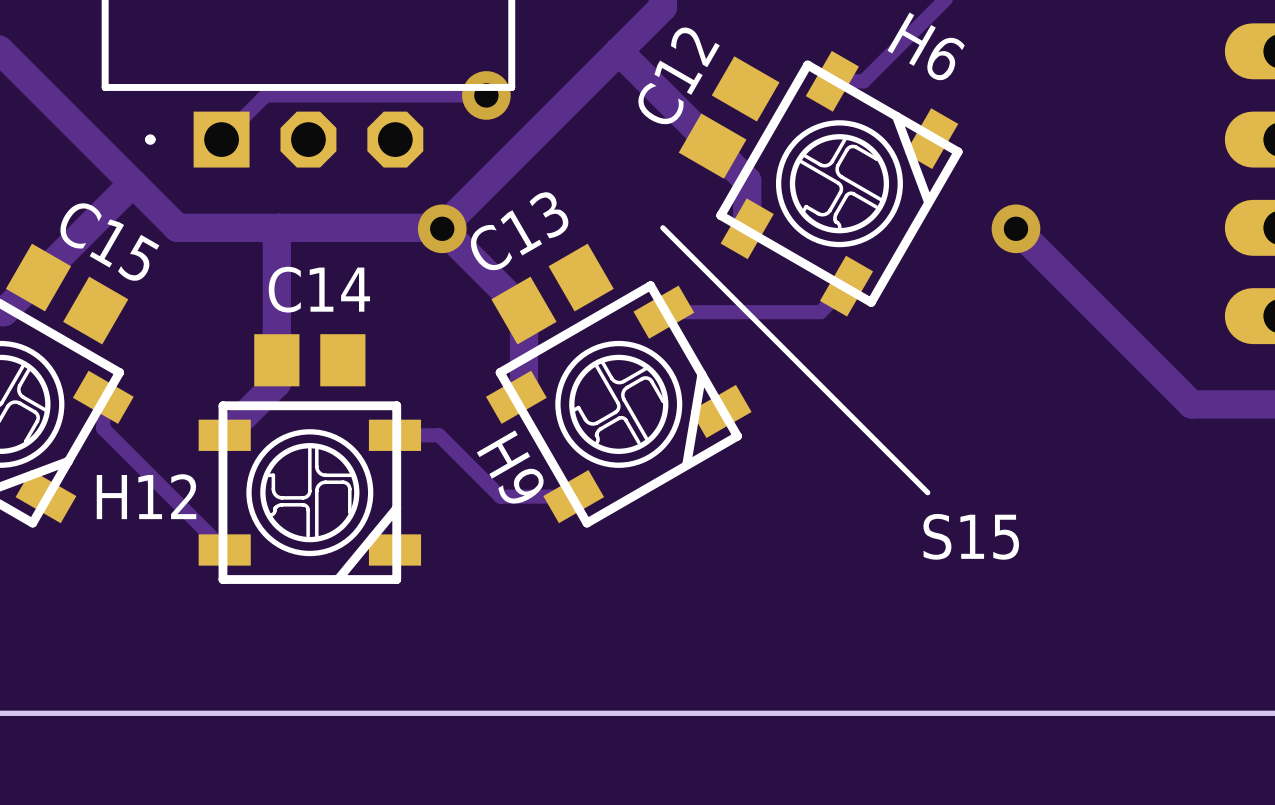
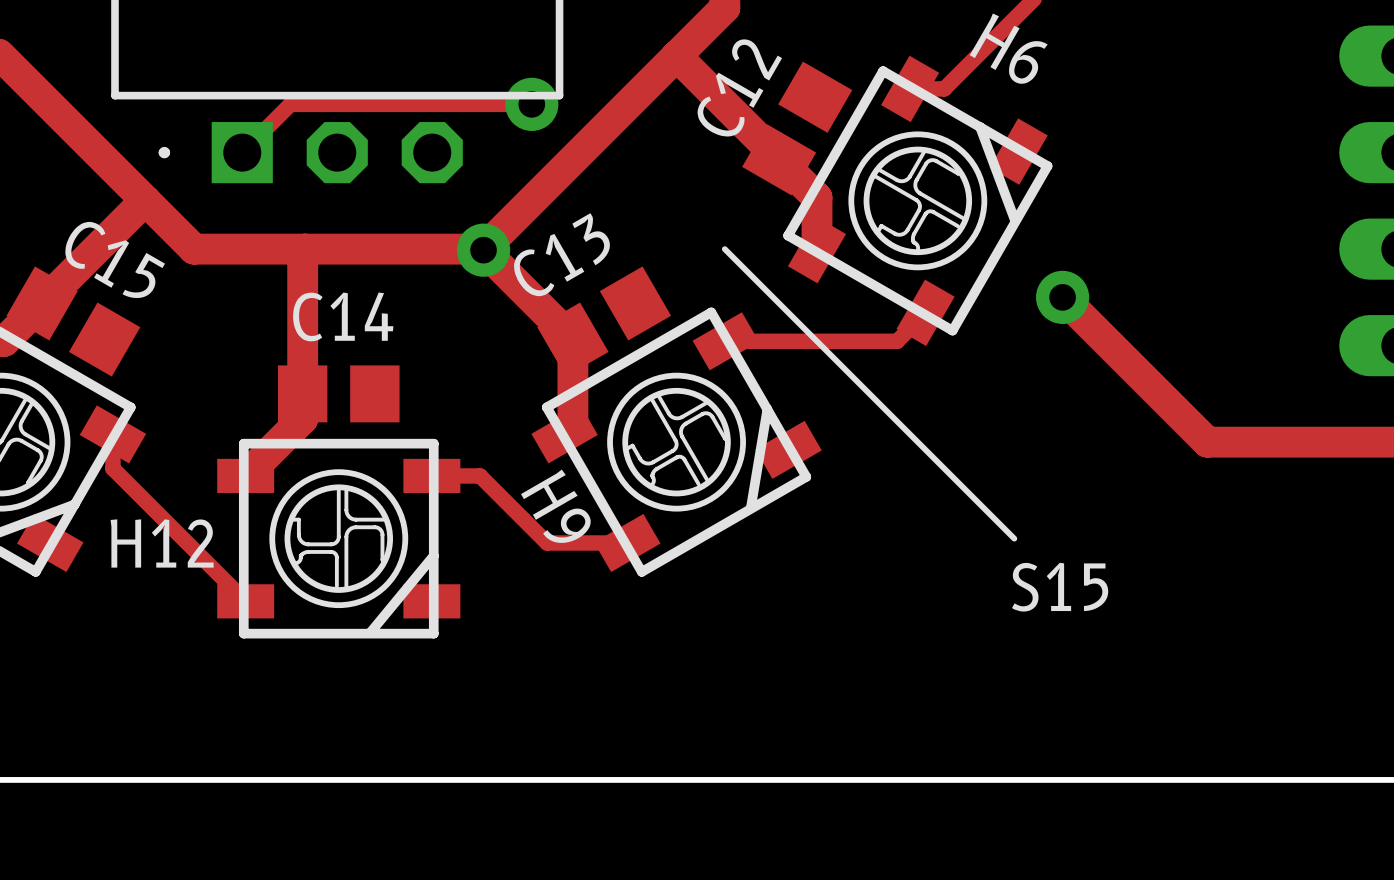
track: (1015, 228) (1191, 404) -> (1062, 297) (1207, 442) (1302, 442)
via position: (1015, 228) -> (1062, 297)

